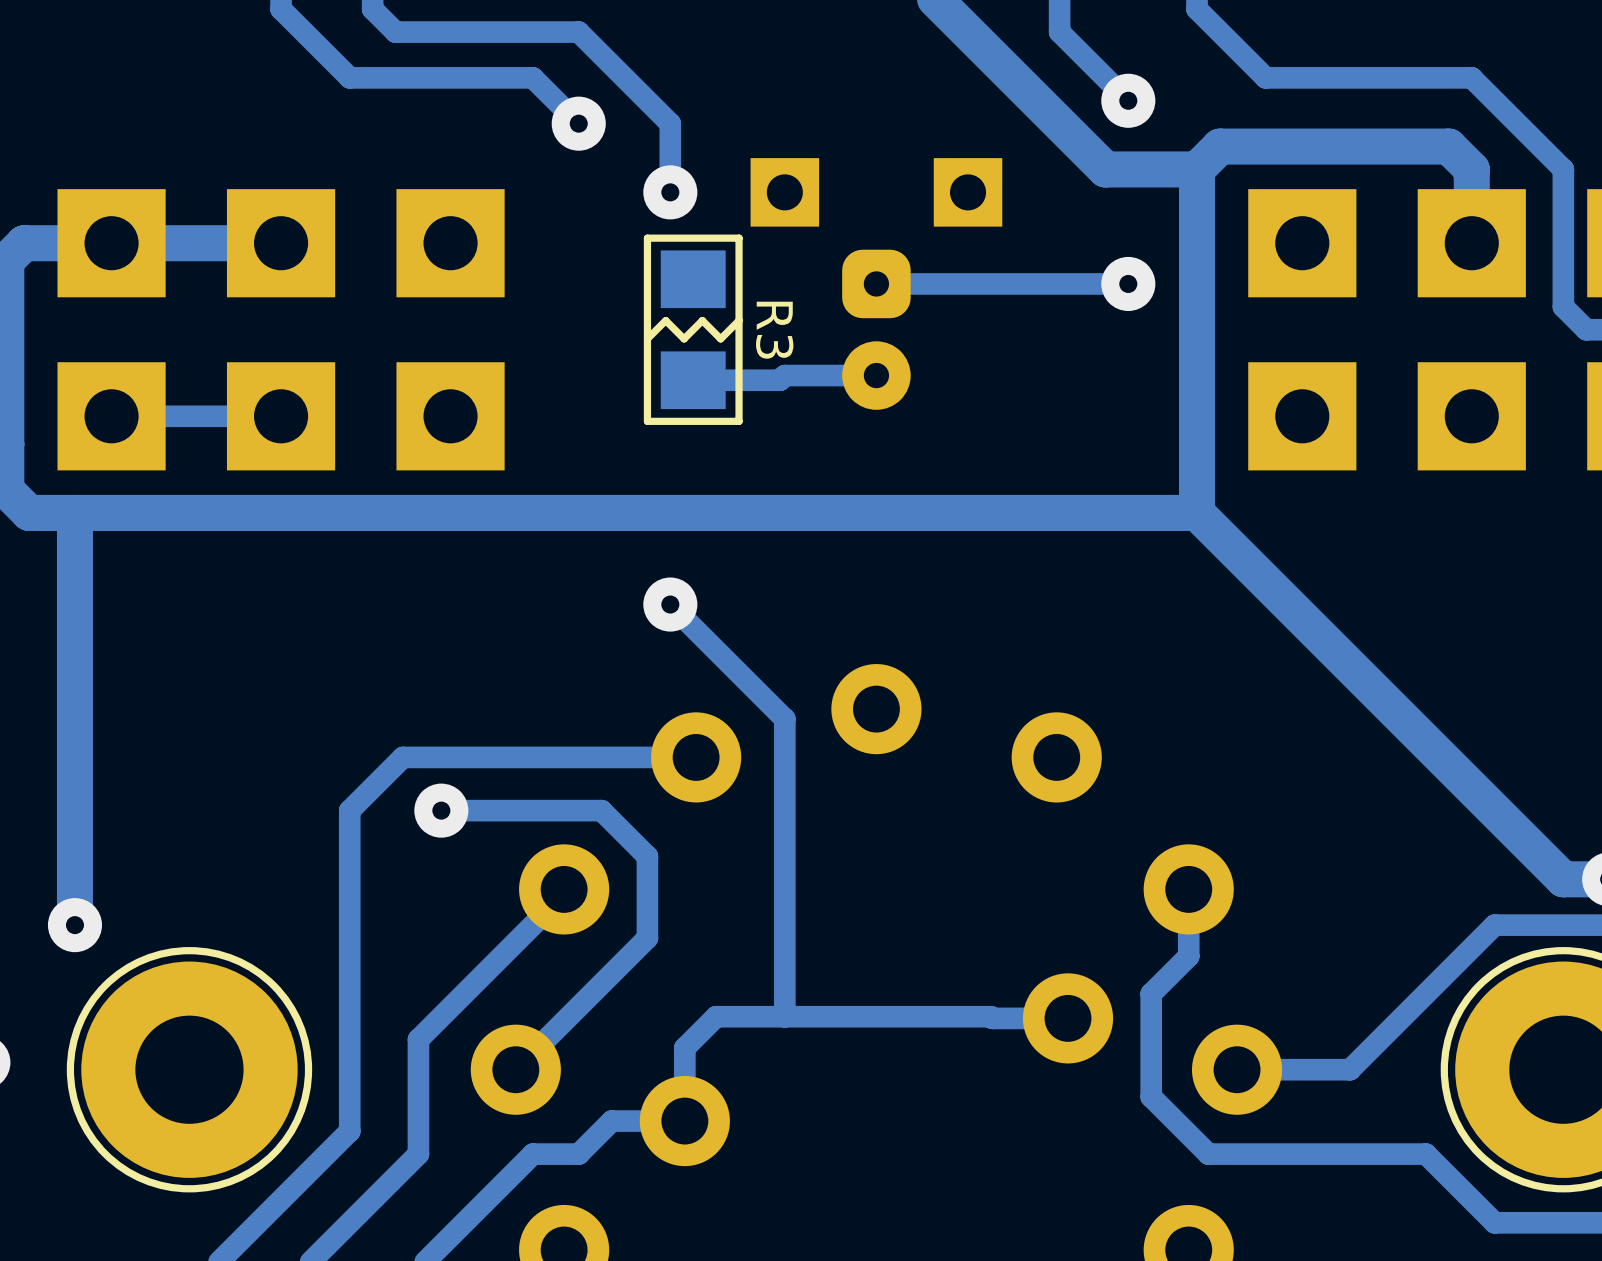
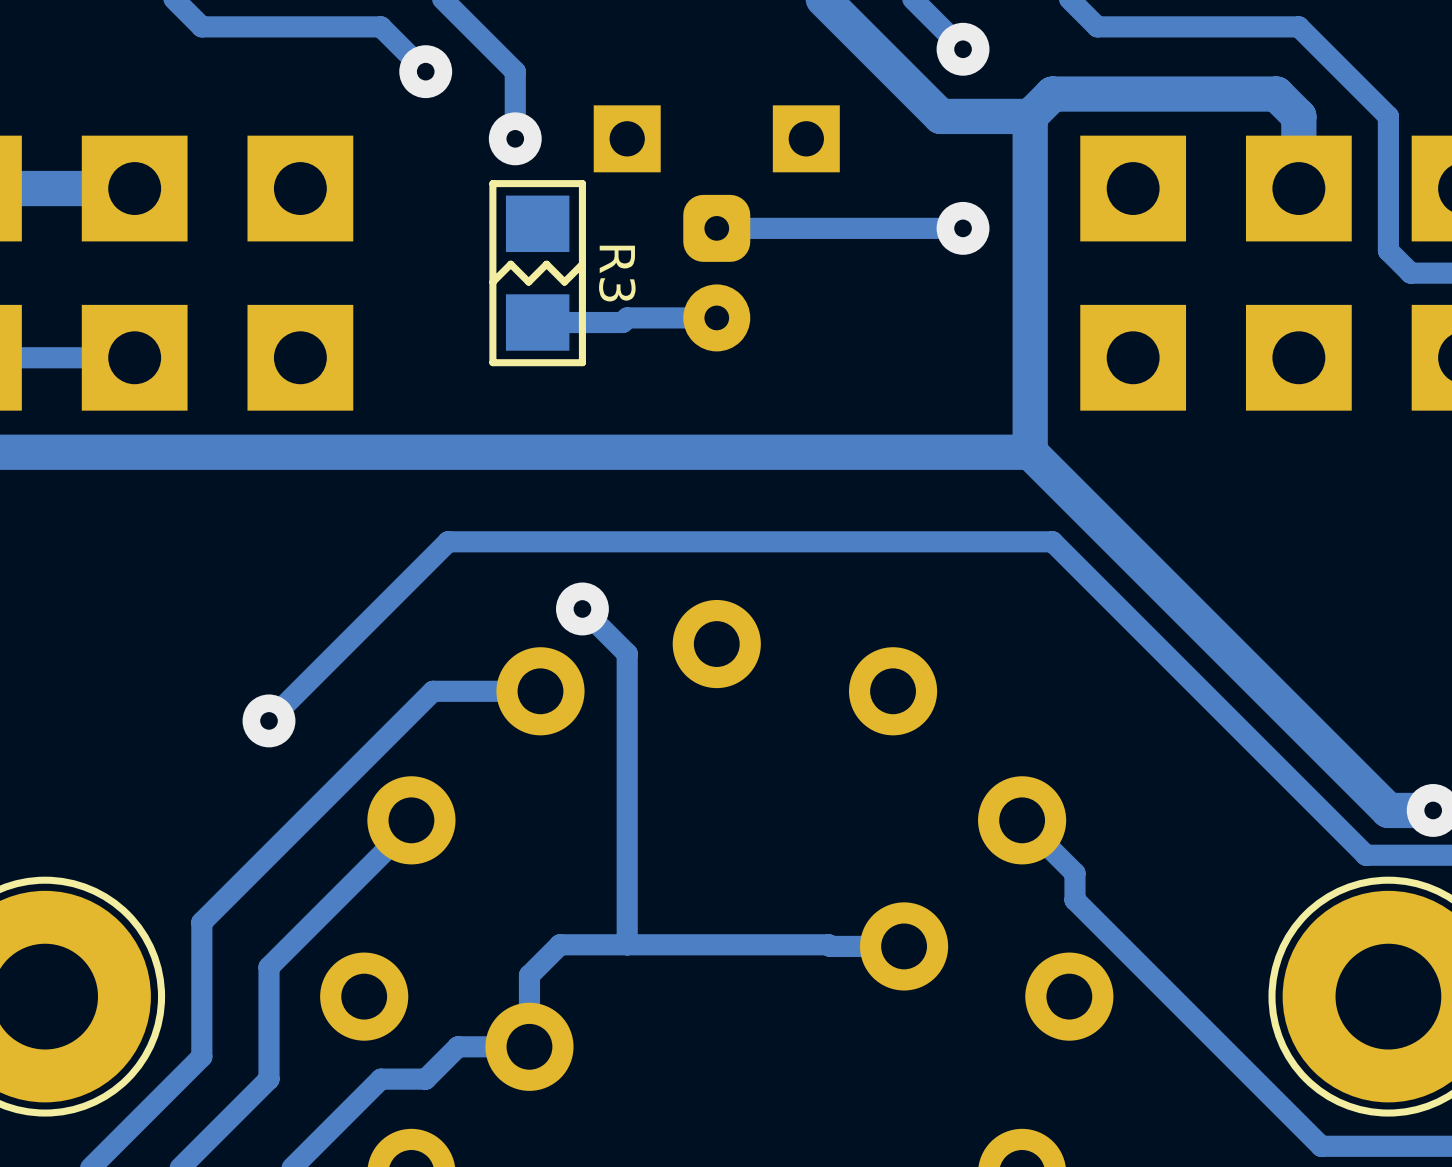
track: (670, 604) (739, 673) -> none
via position: (670, 604) -> (582, 608)
track: (586, 757) (402, 757) (349, 810) (349, 993) -> (432, 691) (201, 922)
track: (441, 810) (601, 810) (647, 856) (647, 938) (515, 1069) -> none
via position: (441, 810) -> (269, 720)
track: (1188, 889) (1188, 956) (1151, 993) (1151, 1096) (1208, 1154) (1425, 1154) -> (1022, 820) (1074, 873) (1074, 900) (1254, 1079)
track: (1540, 925) (1494, 925) (1350, 1069) (1237, 1069) -> (1366, 855) (1052, 541) (448, 541) (269, 720)

